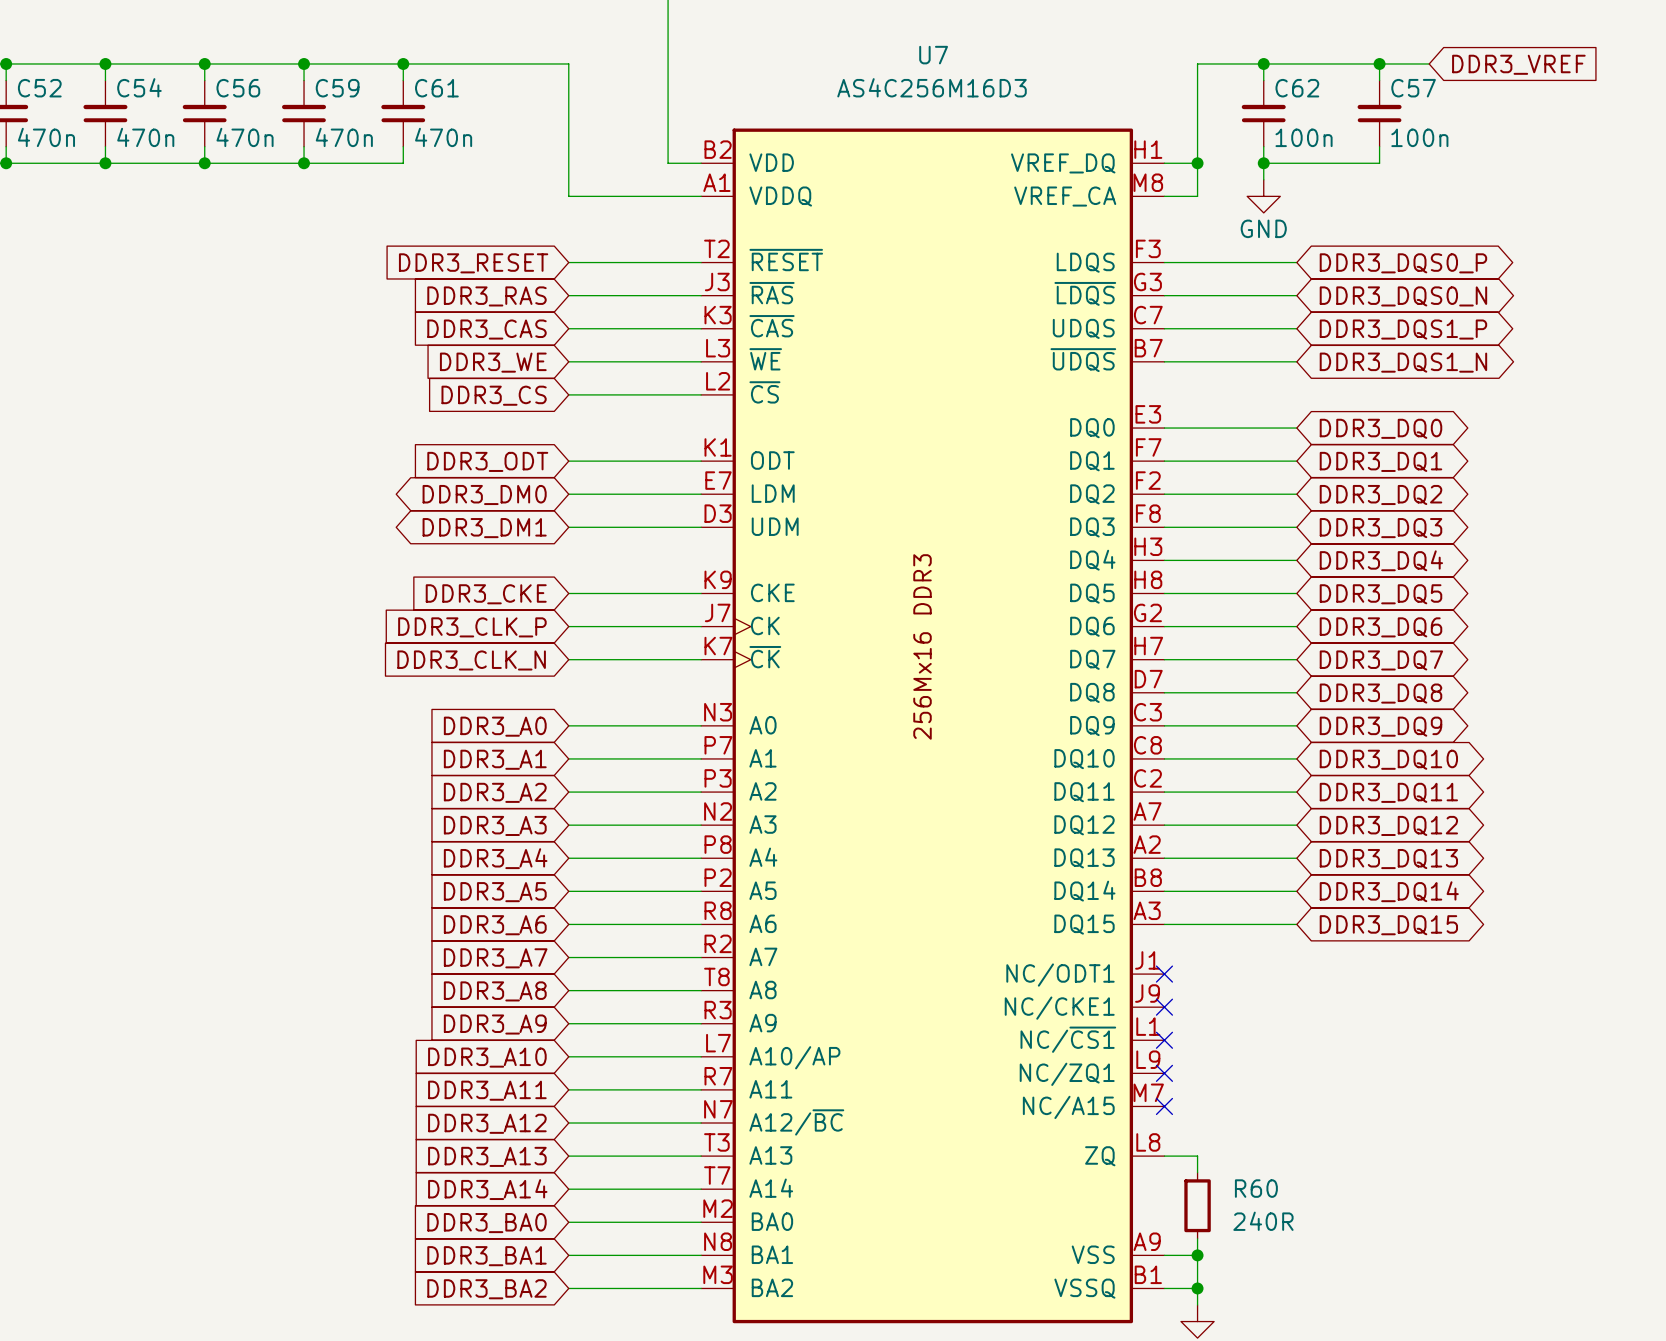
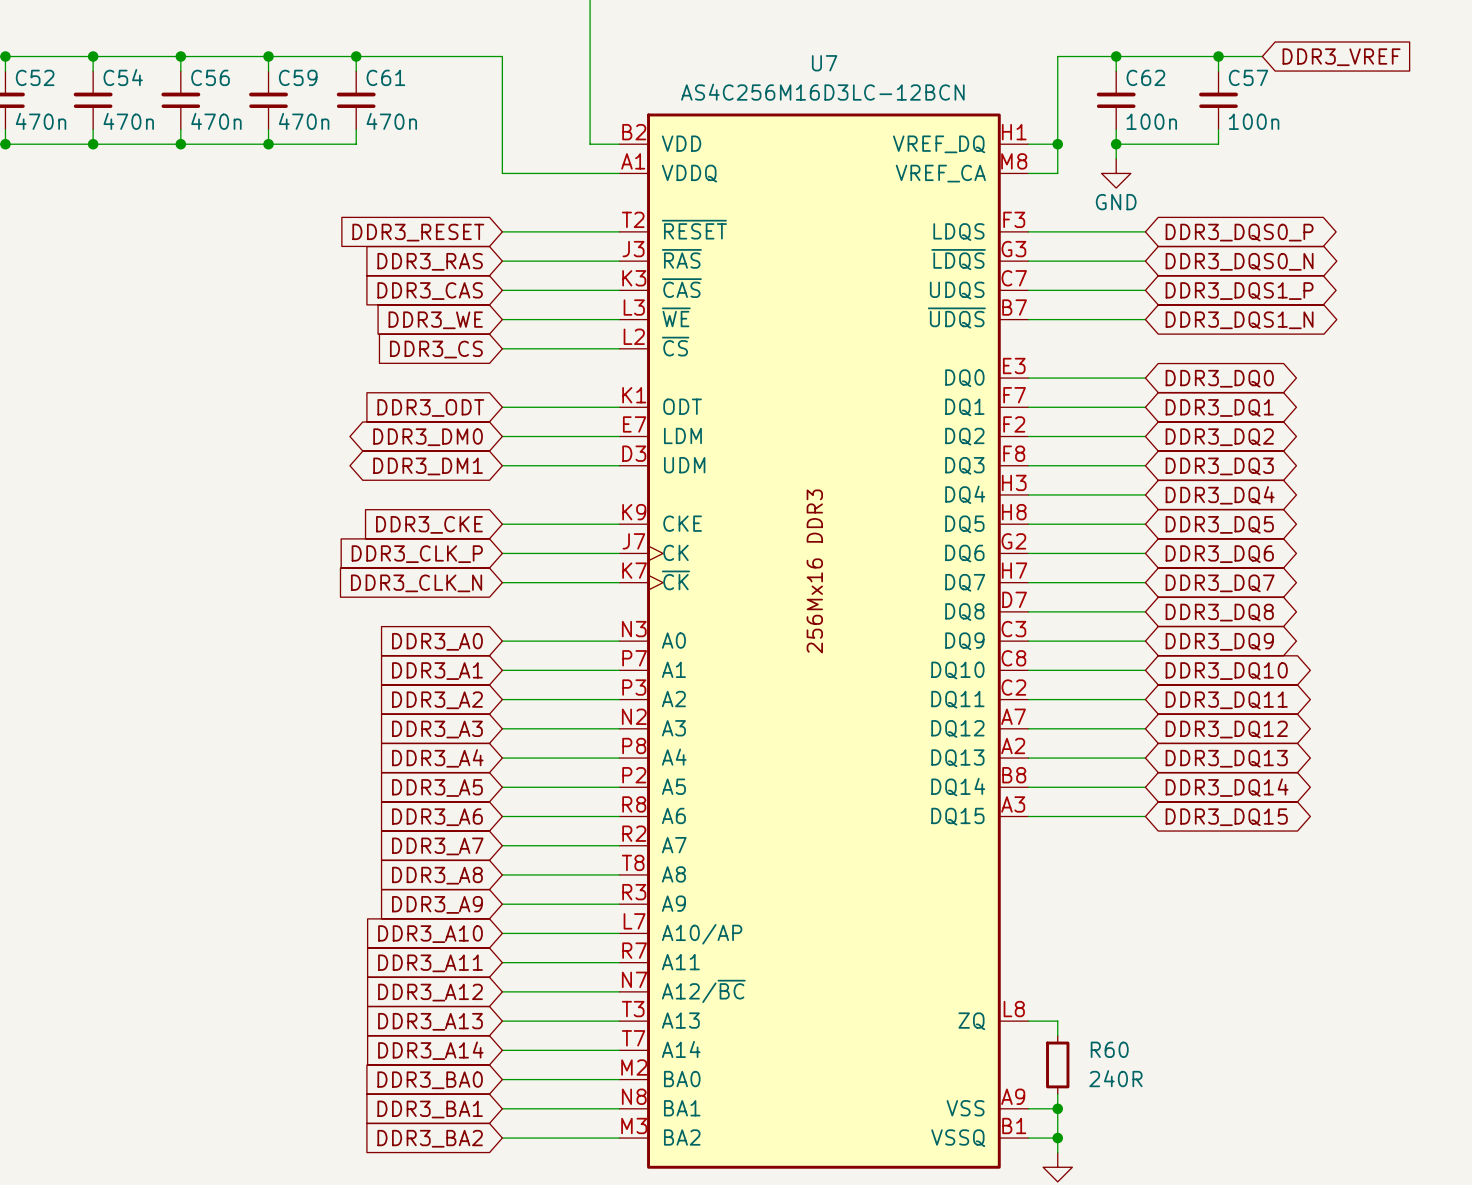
U7 value: AS4C256M16D3 (932, 87) -> none
U7 text: none -> AS4C256M16D3LC-12BCN (822, 92)
U7 symbol: [701, 128, 1165, 1324] -> [619, 113, 1029, 1169]
no-connect mark: (1164, 974) -> none
no-connect mark: (1164, 1007) -> none
no-connect mark: (1164, 1040) -> none
no-connect mark: (1164, 1073) -> none
no-connect mark: (1164, 1106) -> none

